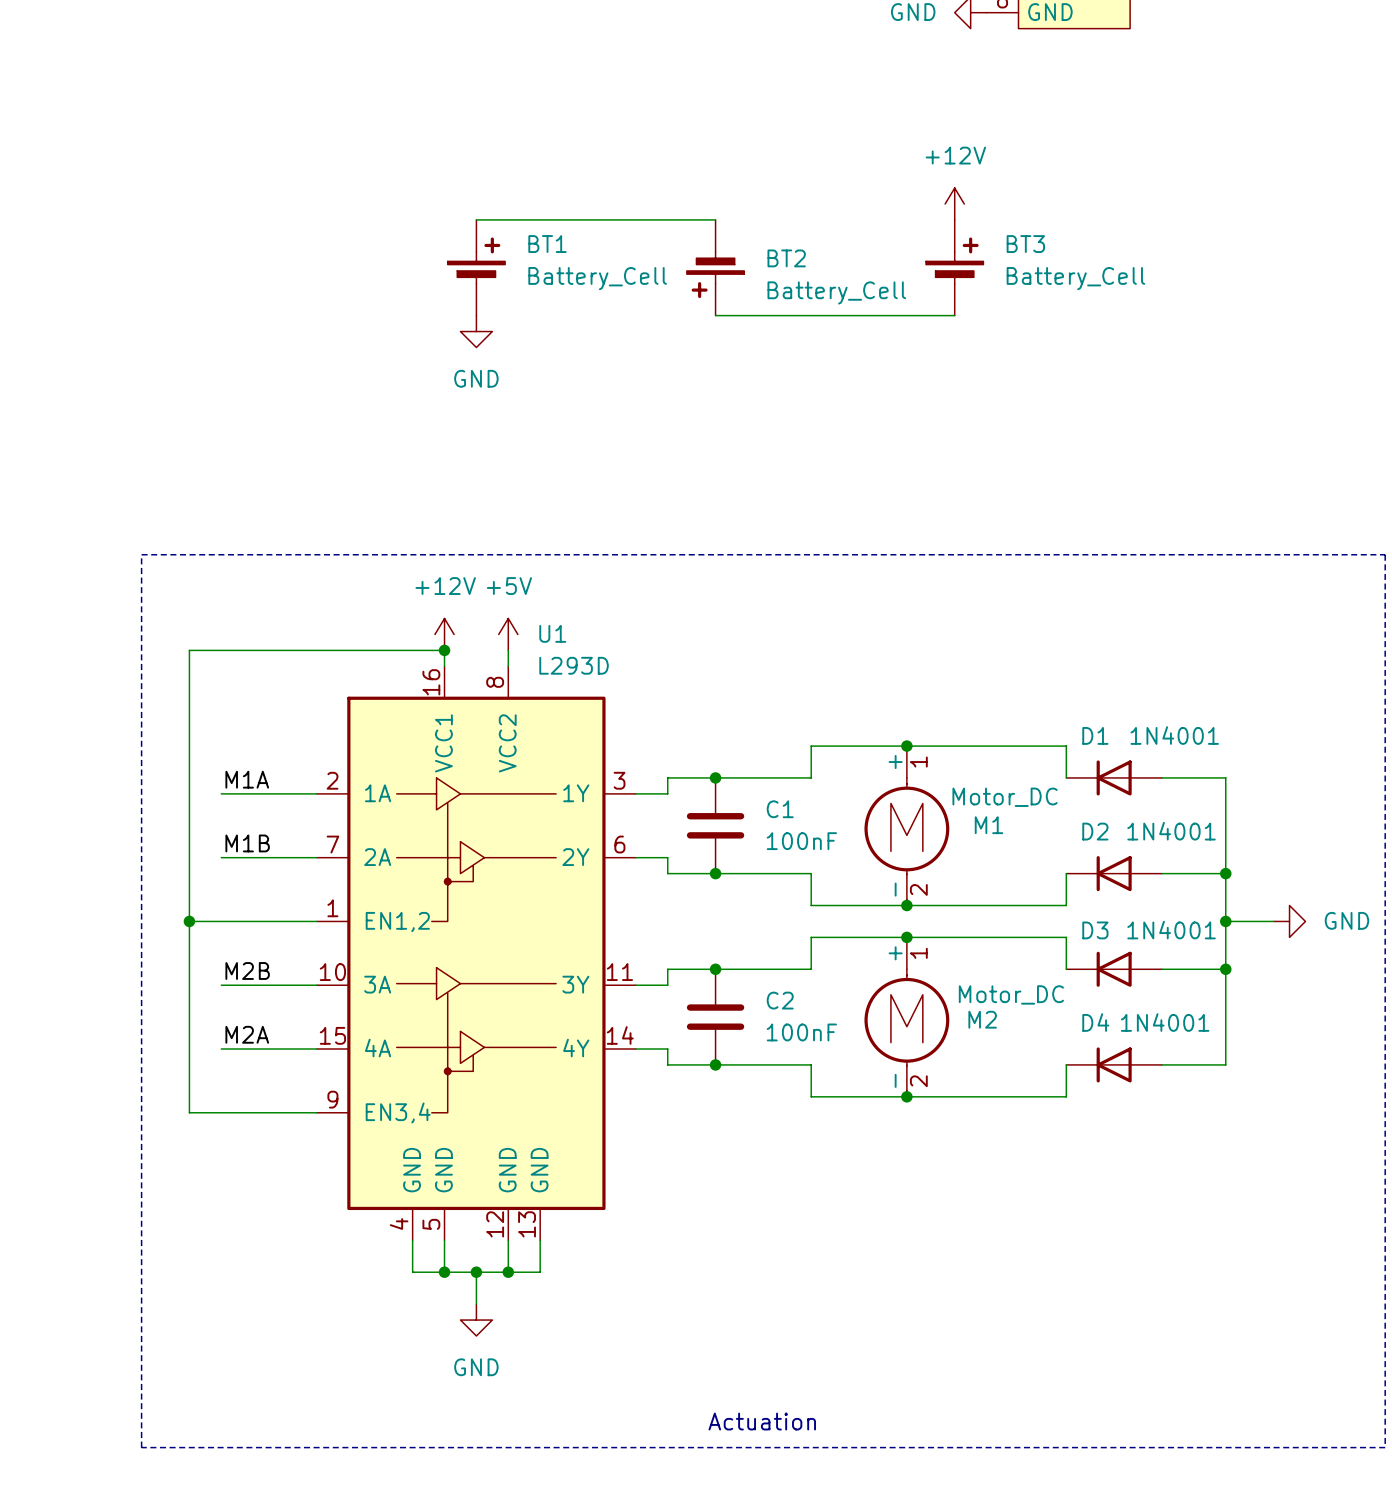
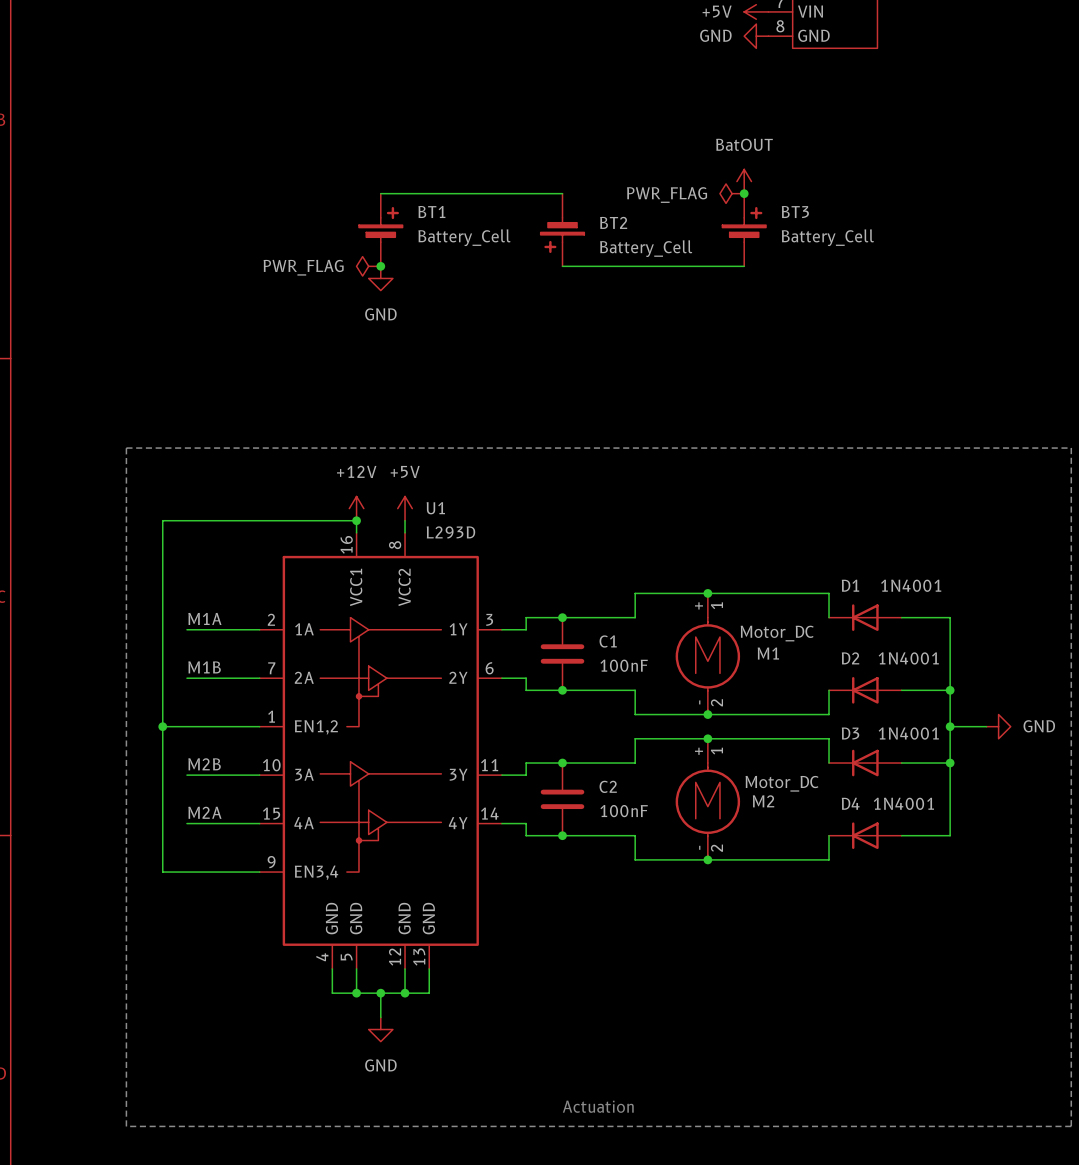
power symbol: +12V (954, 204) -> BatOUT (744, 181)
power symbol: none -> PWR_FLAG (732, 193)
junction: none -> (744, 193)
power symbol: none -> PWR_FLAG (368, 266)
junction: none -> (380, 266)

